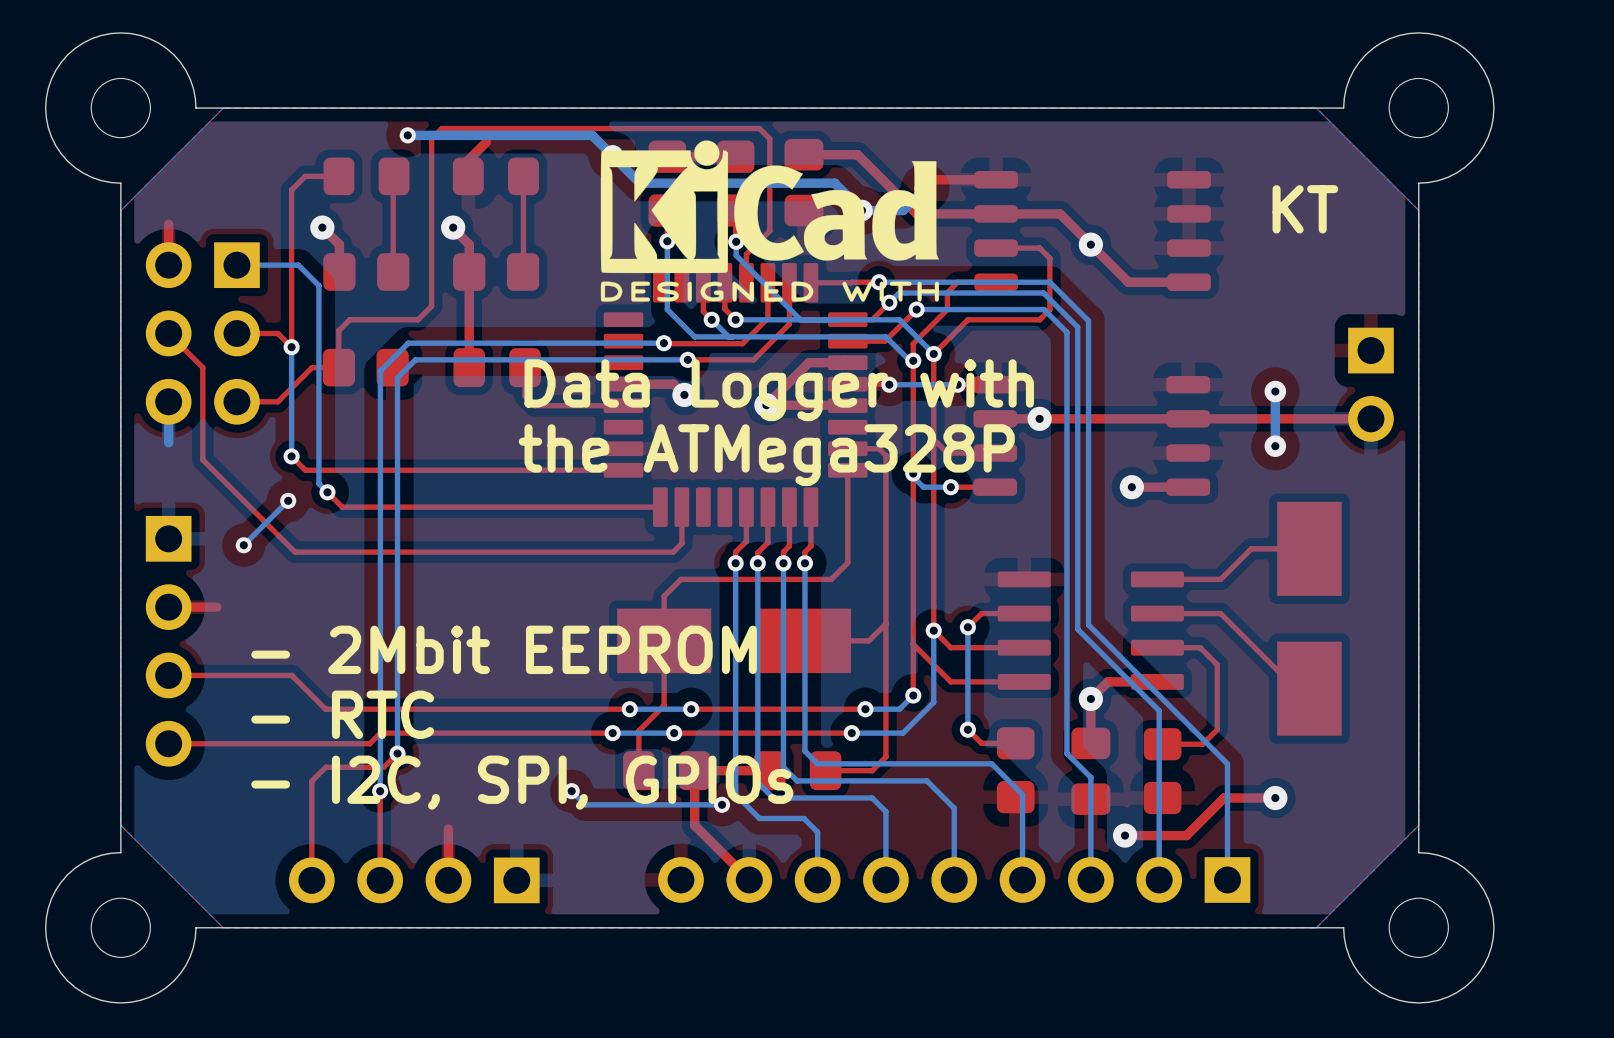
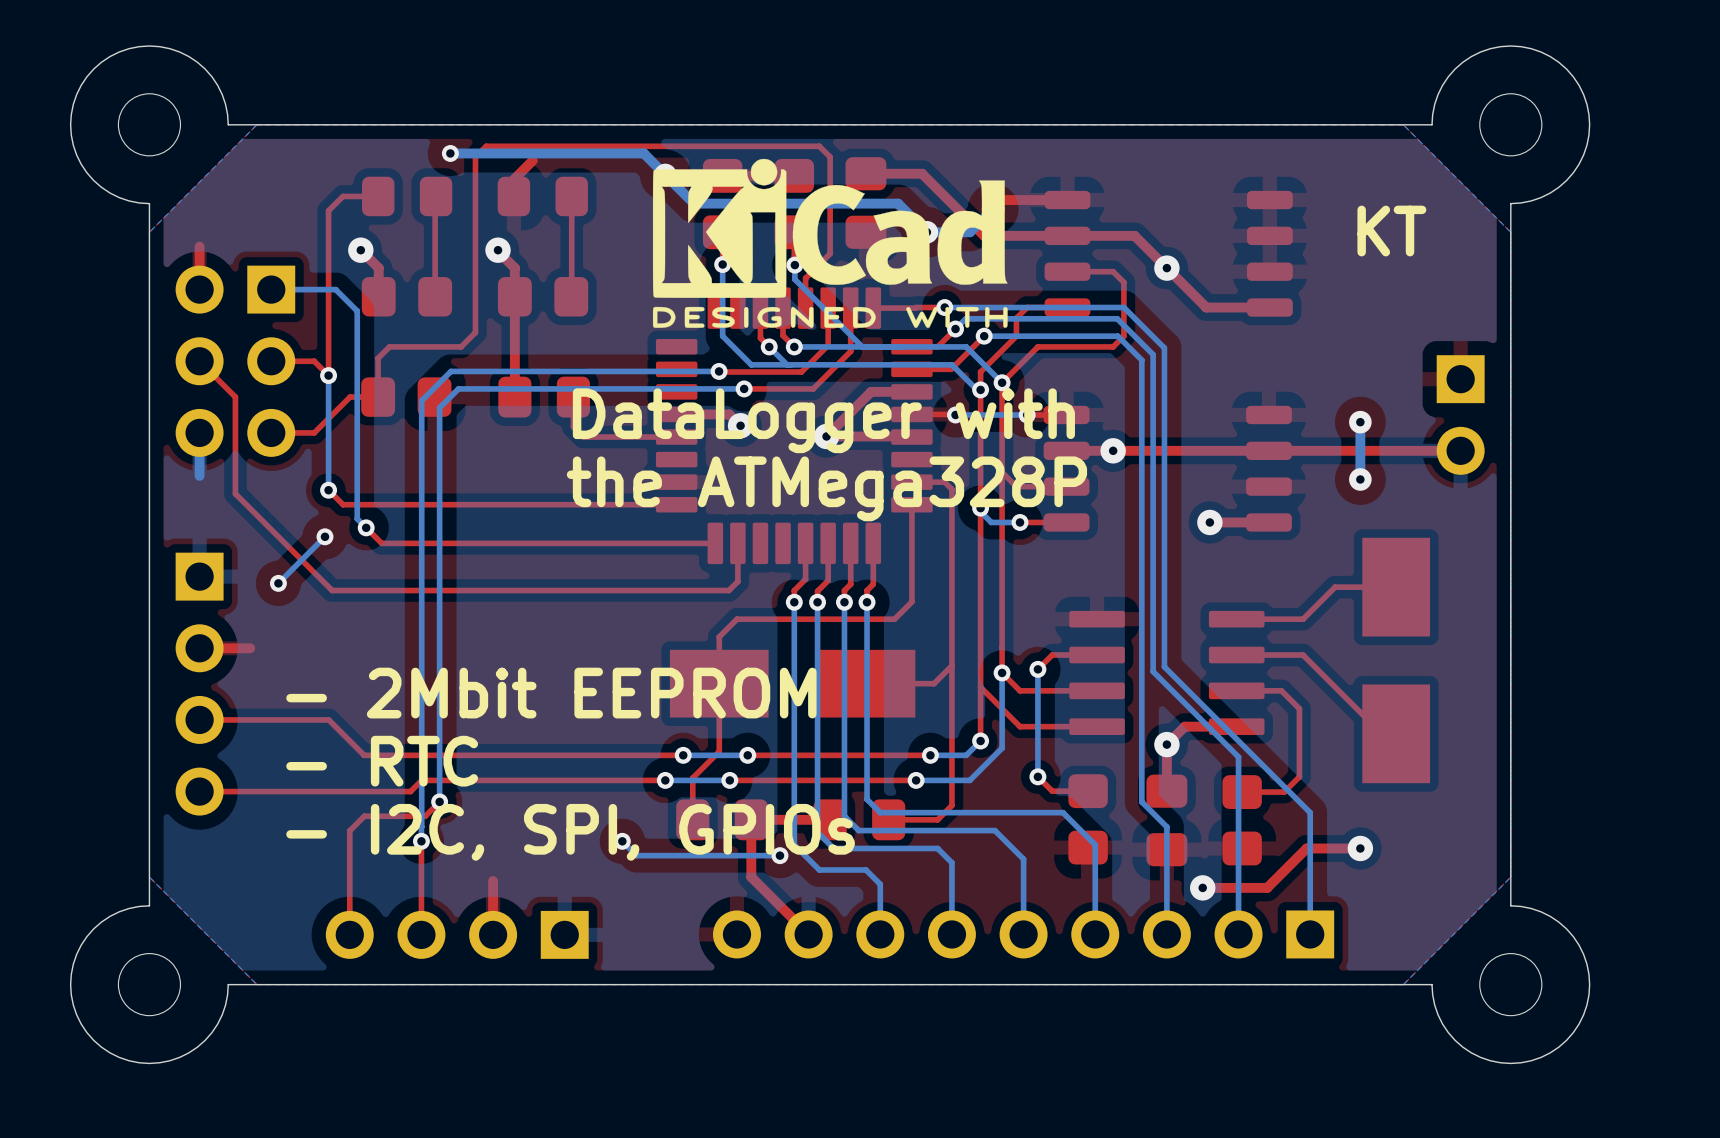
text: Data Logger with (779, 390) -> DataLogger with (823, 420)

